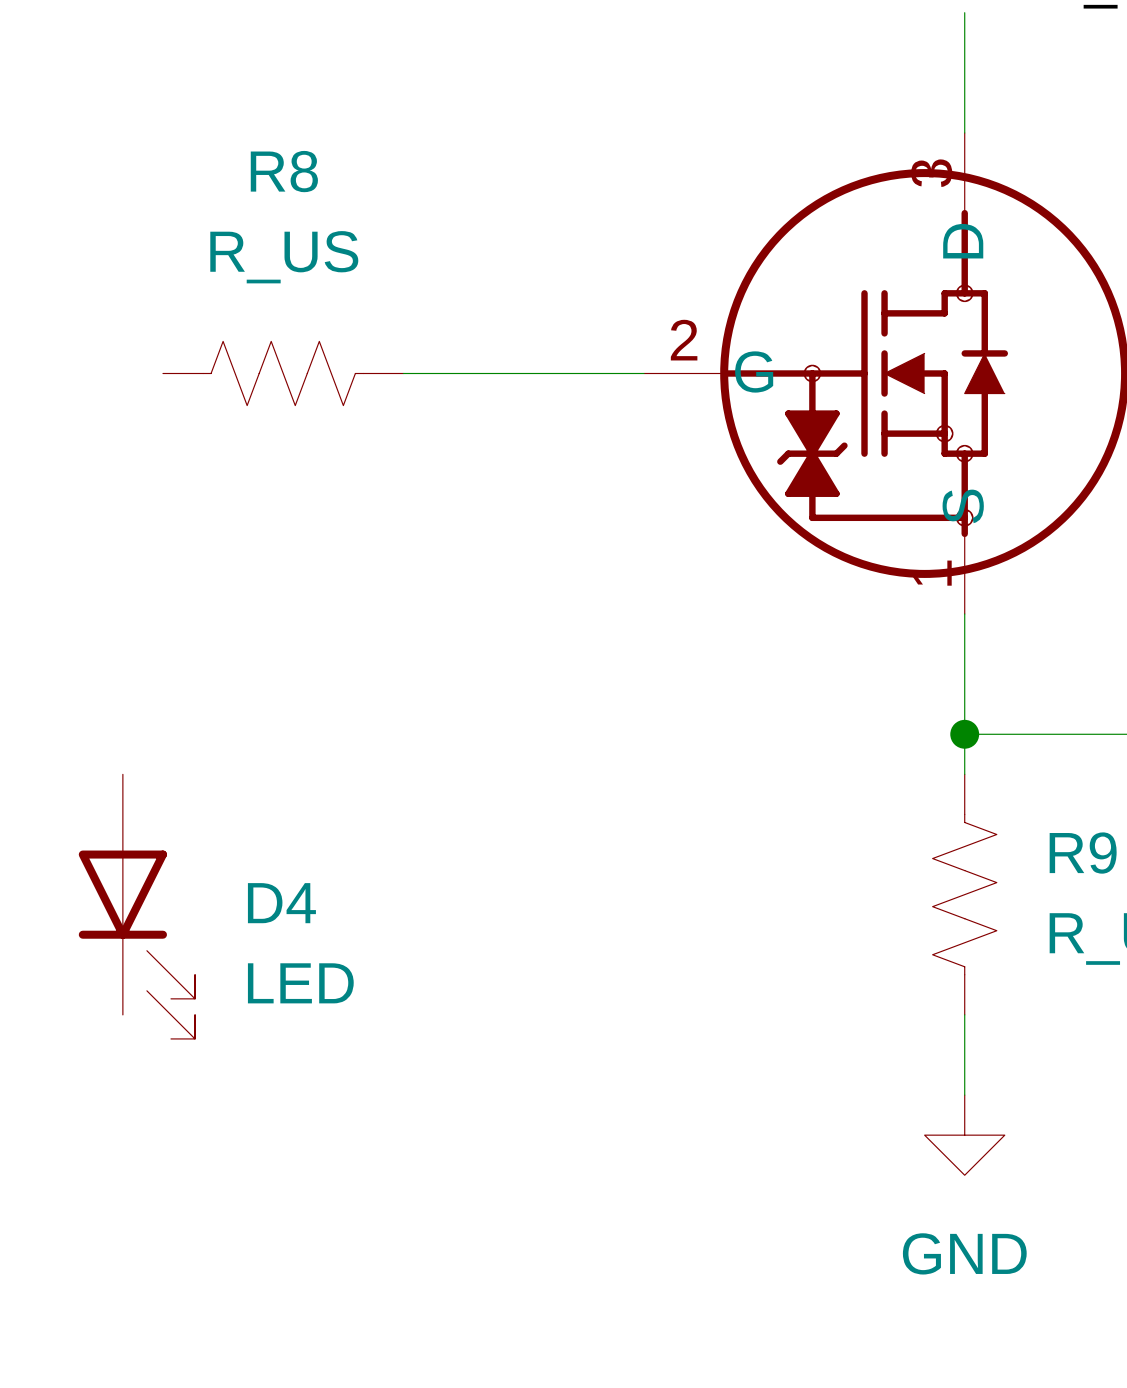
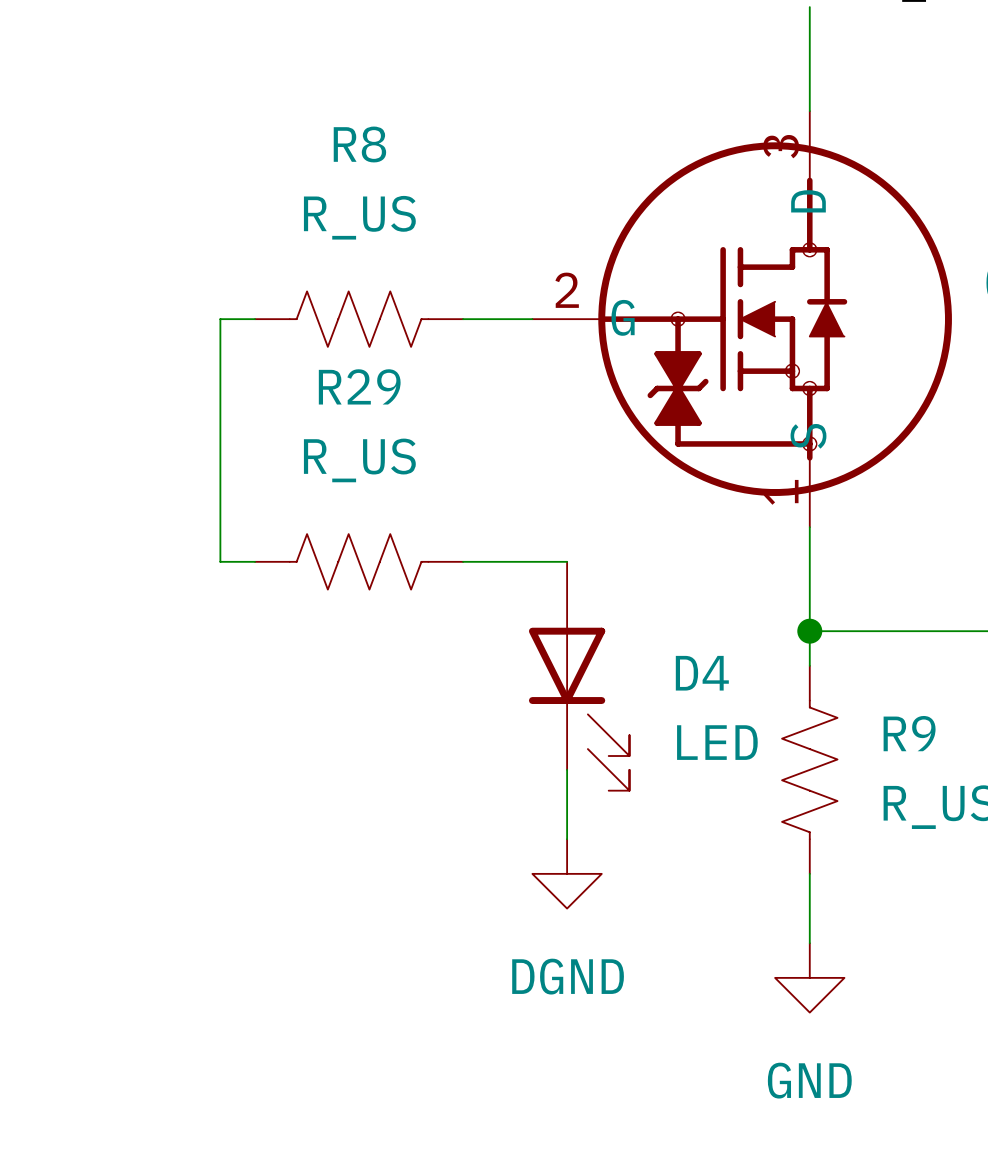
R8 position: (283, 373) -> (359, 319)
wire: none -> (255, 319) (220, 319) (220, 561) (255, 561)
wire: (403, 373) (563, 373) -> none
R29: none -> R_US (359, 561)
wire: none -> (463, 561) (567, 561)
wire: none -> (567, 769) (567, 839)
D4 position: (136, 906) -> (579, 676)
power symbol: none -> DGND (567, 873)

